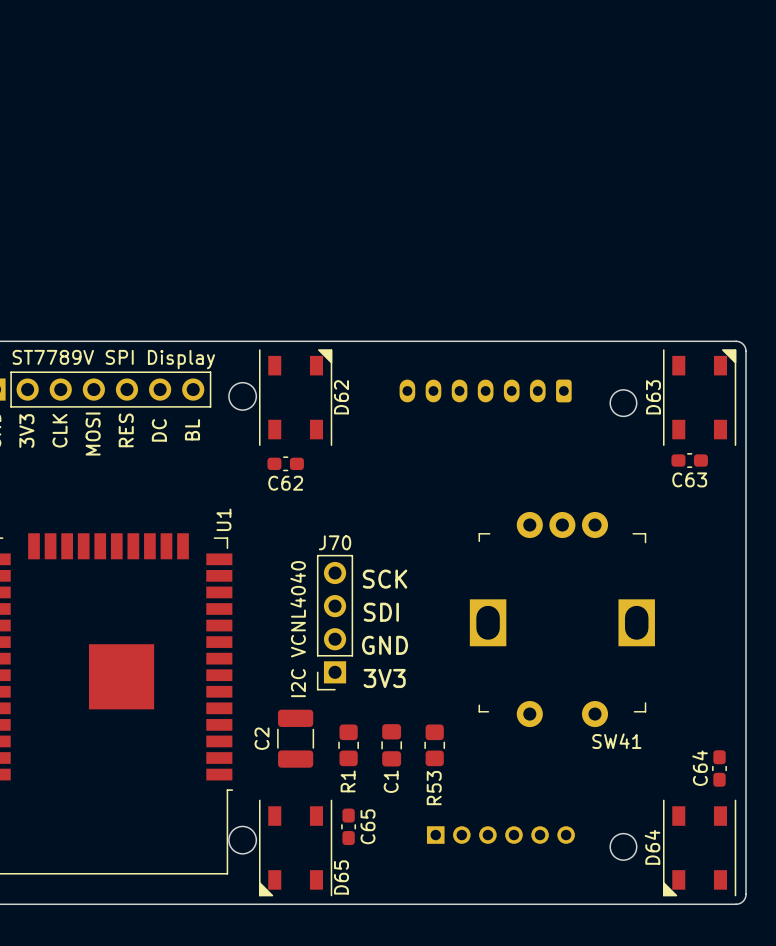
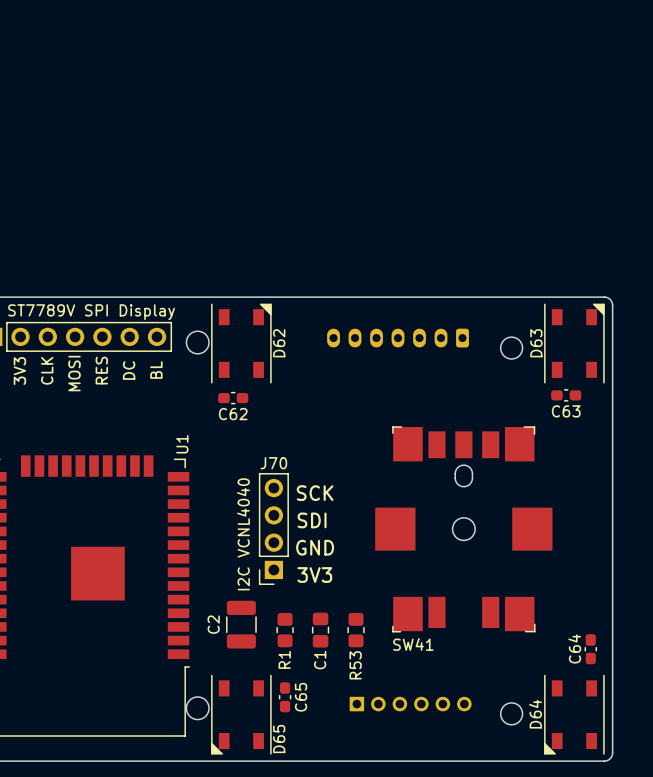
SW41 footprint: [469, 511, 655, 728] -> [375, 426, 553, 633]
SW41 name position: SW41 (616, 741) -> SW41 (413, 644)

